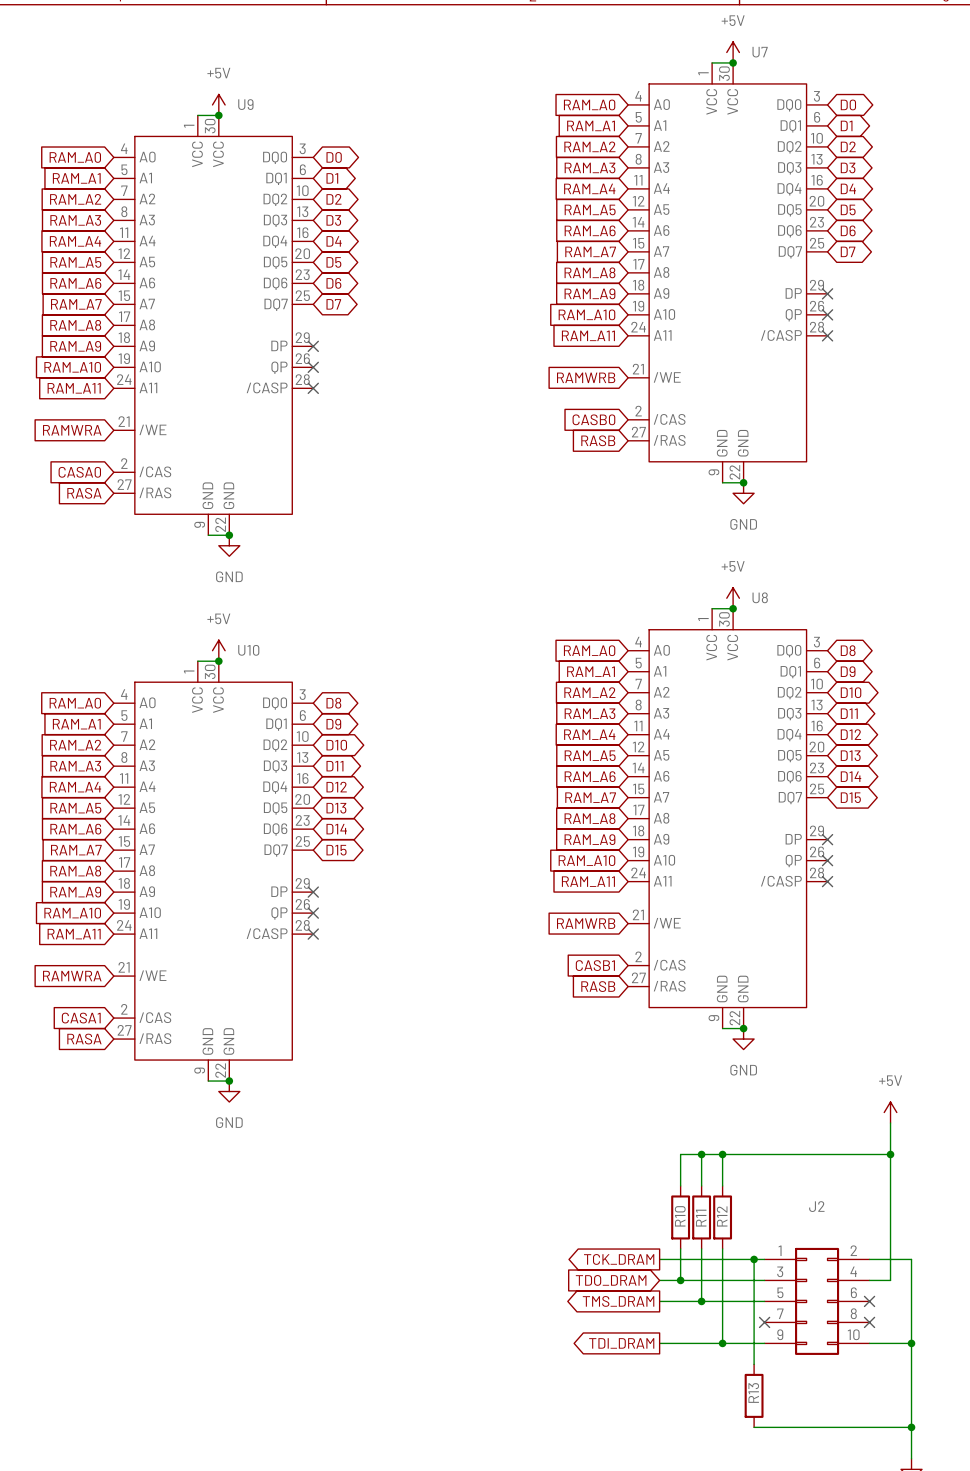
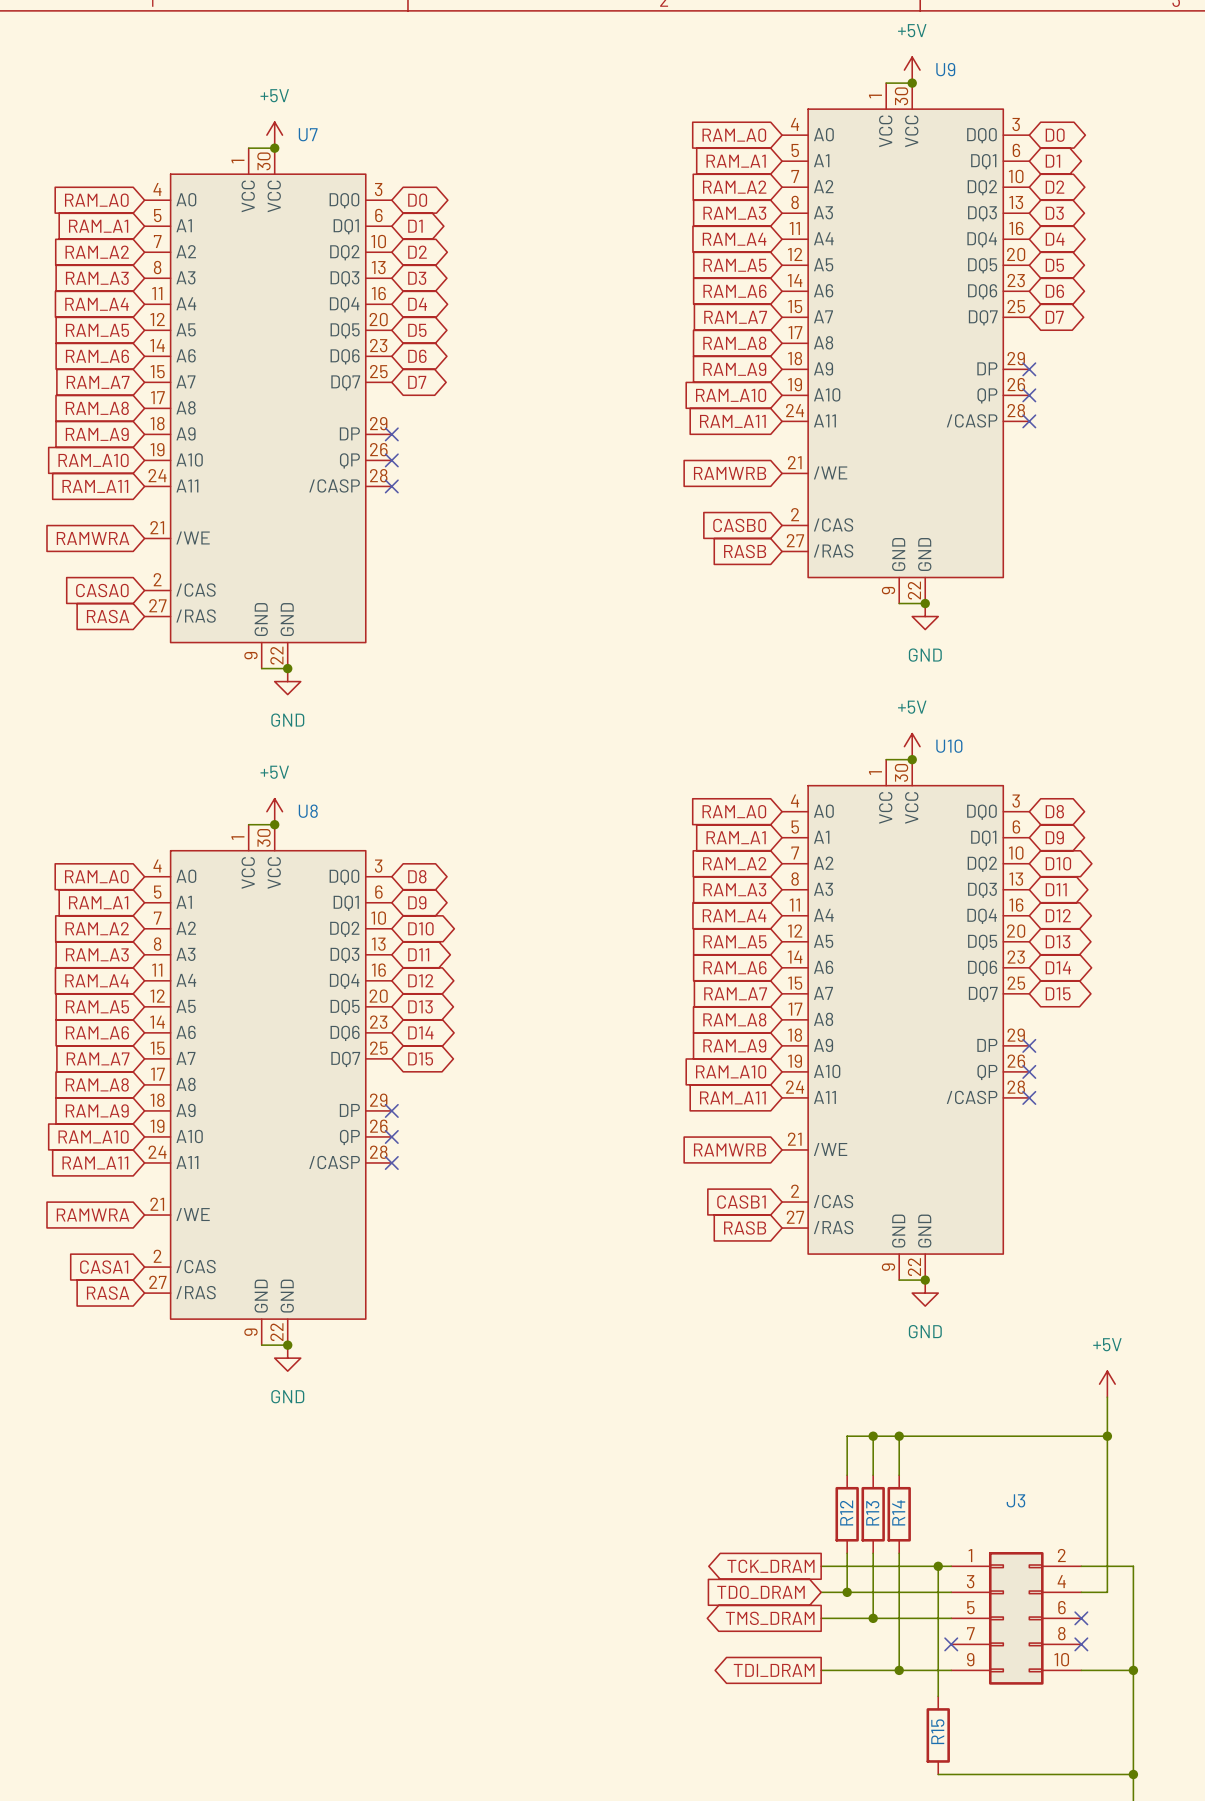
U7 name: U7 (760, 52) -> U9 (945, 69)
U9 name: U9 (245, 104) -> U7 (308, 134)
U8 name: U8 (760, 597) -> U10 (949, 746)
U10 name: U10 (248, 650) -> U8 (308, 811)
J2 name: J2 (816, 1206) -> J3 (1015, 1500)
R10 name: R10 (680, 1216) -> R12 (846, 1513)
R12 name: R12 (722, 1216) -> R14 (898, 1512)
R11 name: R11 (701, 1218) -> R13 (872, 1513)
R13 name: R13 (753, 1392) -> R15 (937, 1731)

